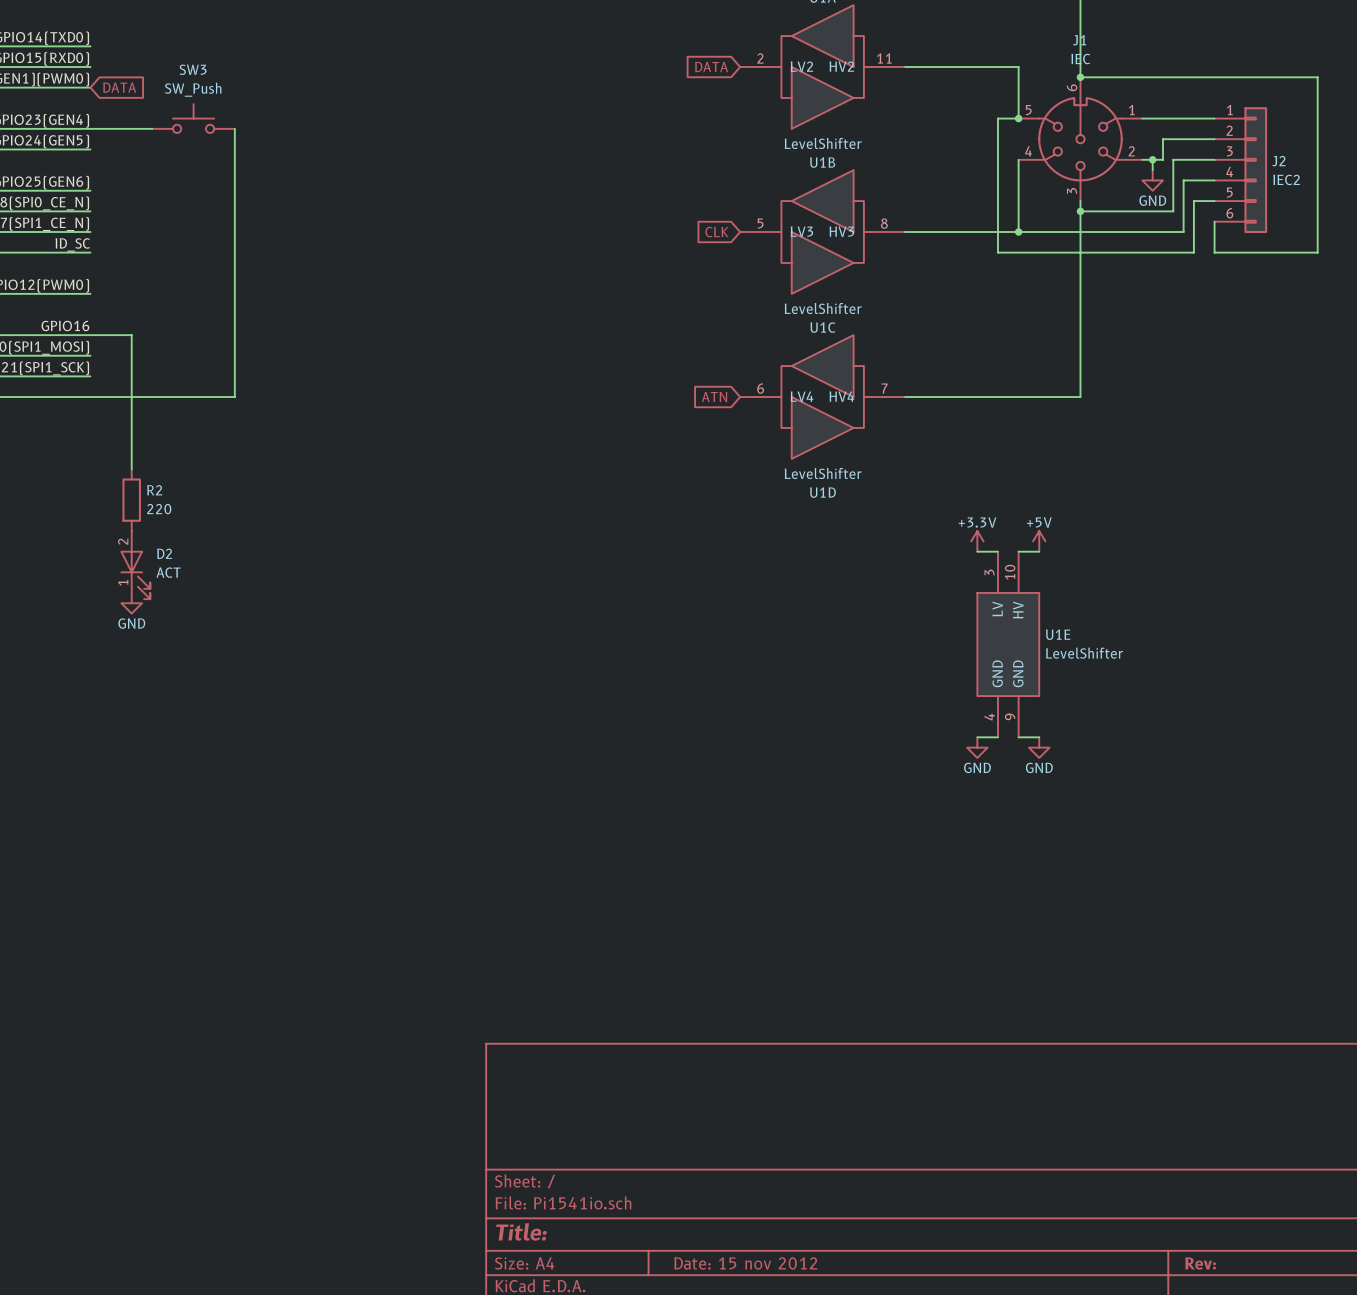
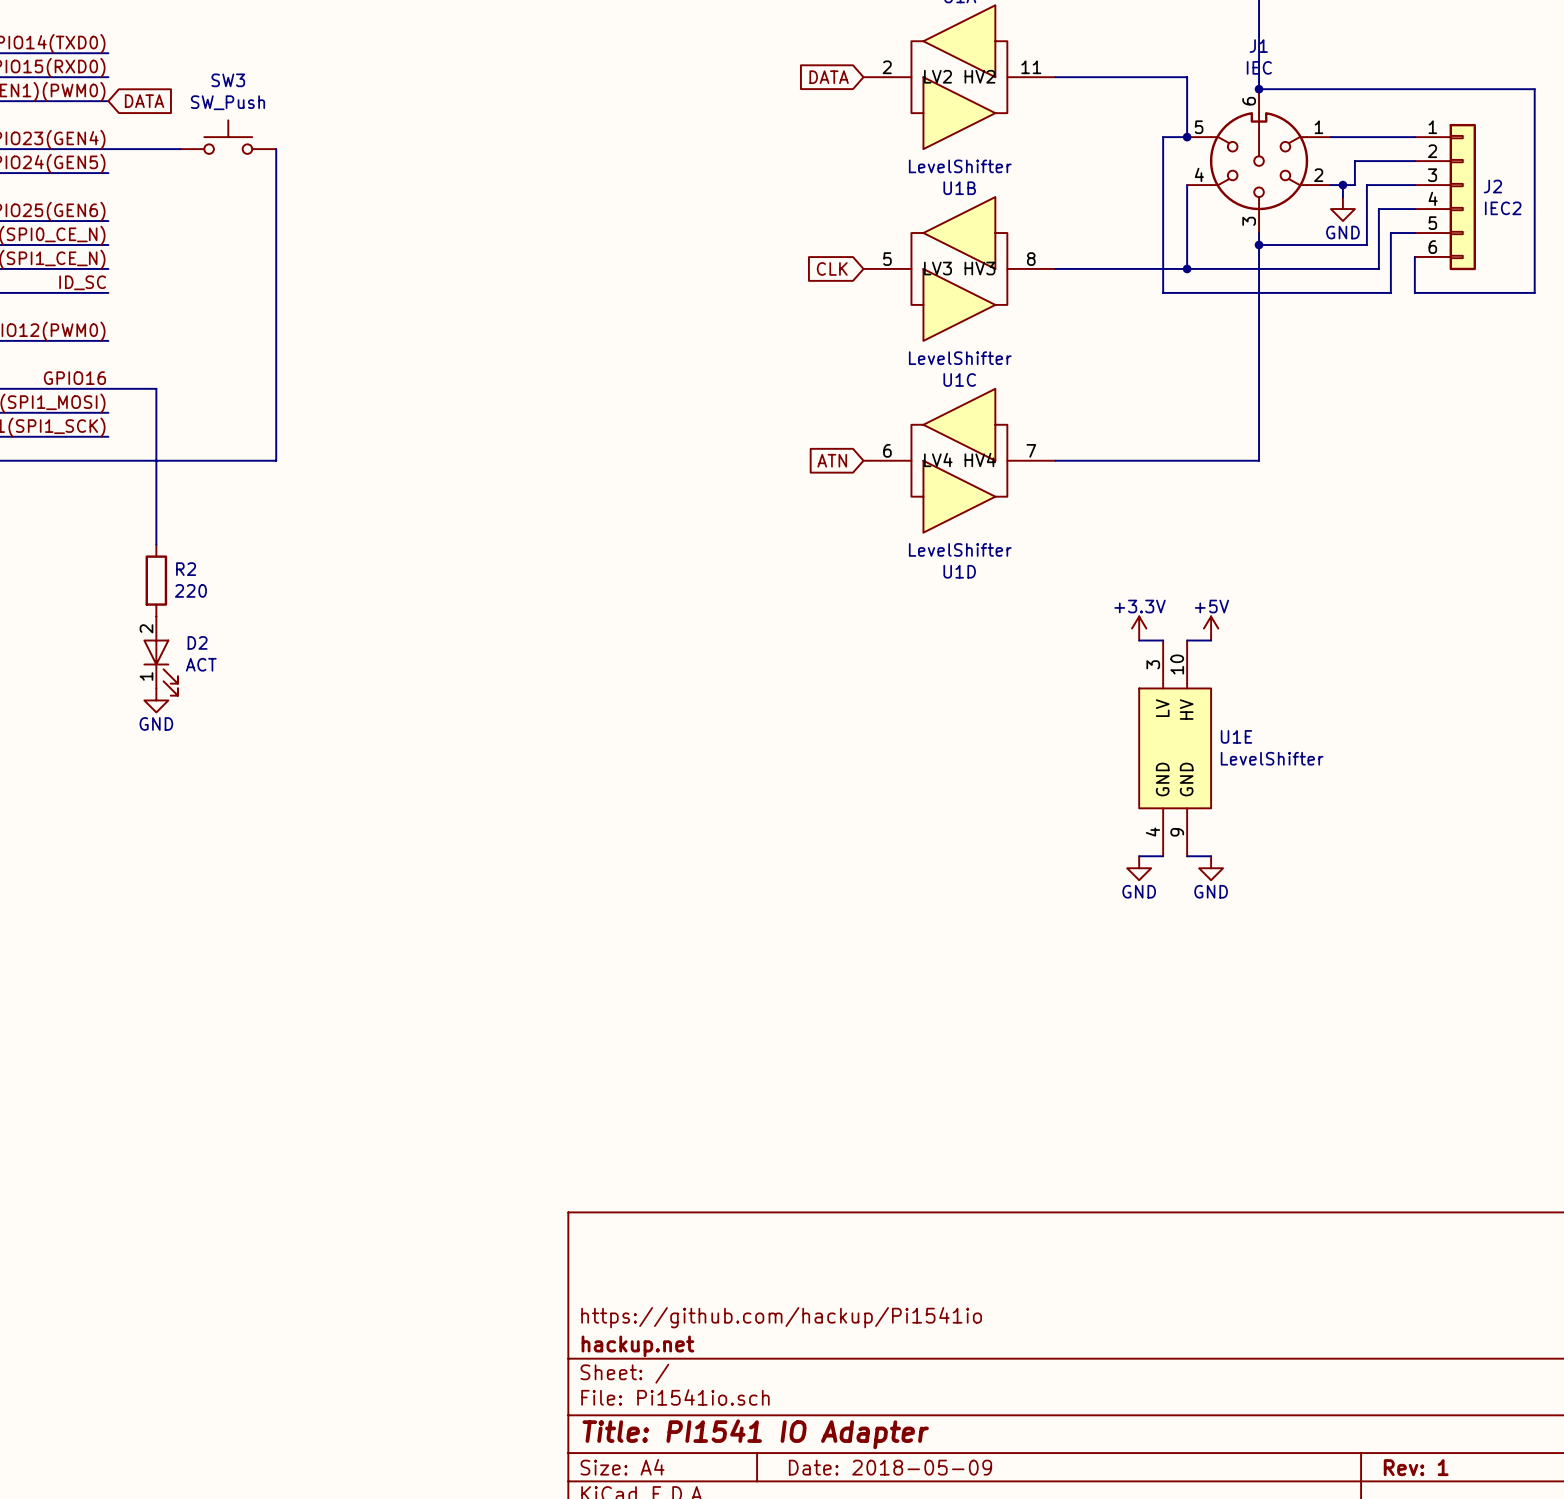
title block: none -> https://github.com/hackup/Pi1541io (781, 1317)
title block: none -> hackup.net (637, 1346)
title block: Title: (521, 1231) -> Title: PI1541 IO Adapter (755, 1434)
title block: Date: 15 nov 2012 (745, 1263) -> Date: 2018-05-09 (890, 1467)
title block: Rev: (1200, 1263) -> Rev: 1 (1416, 1467)

